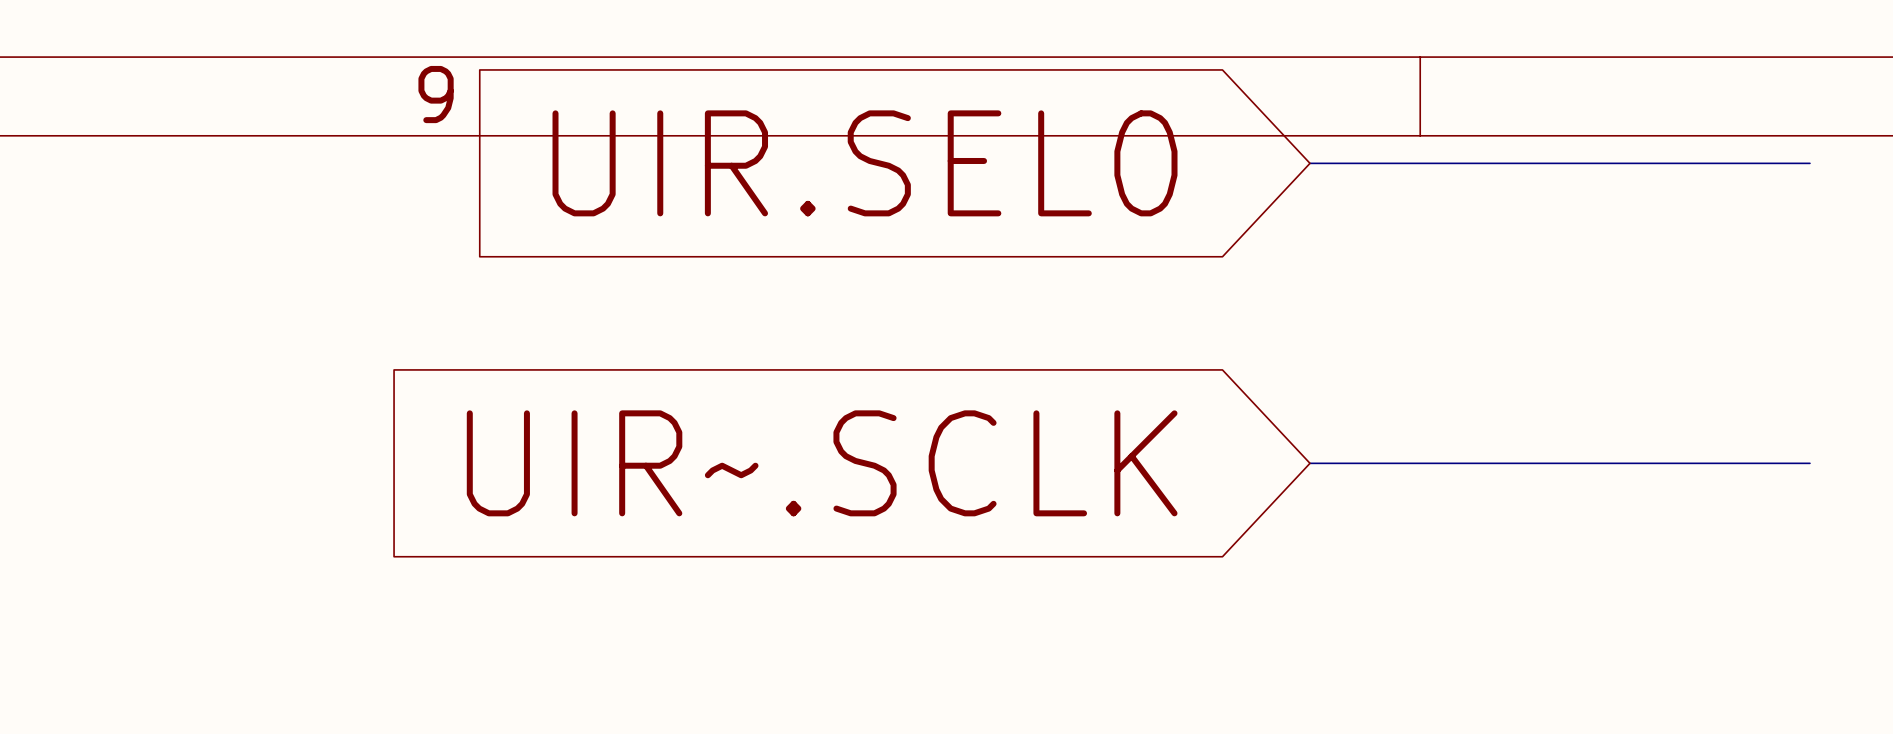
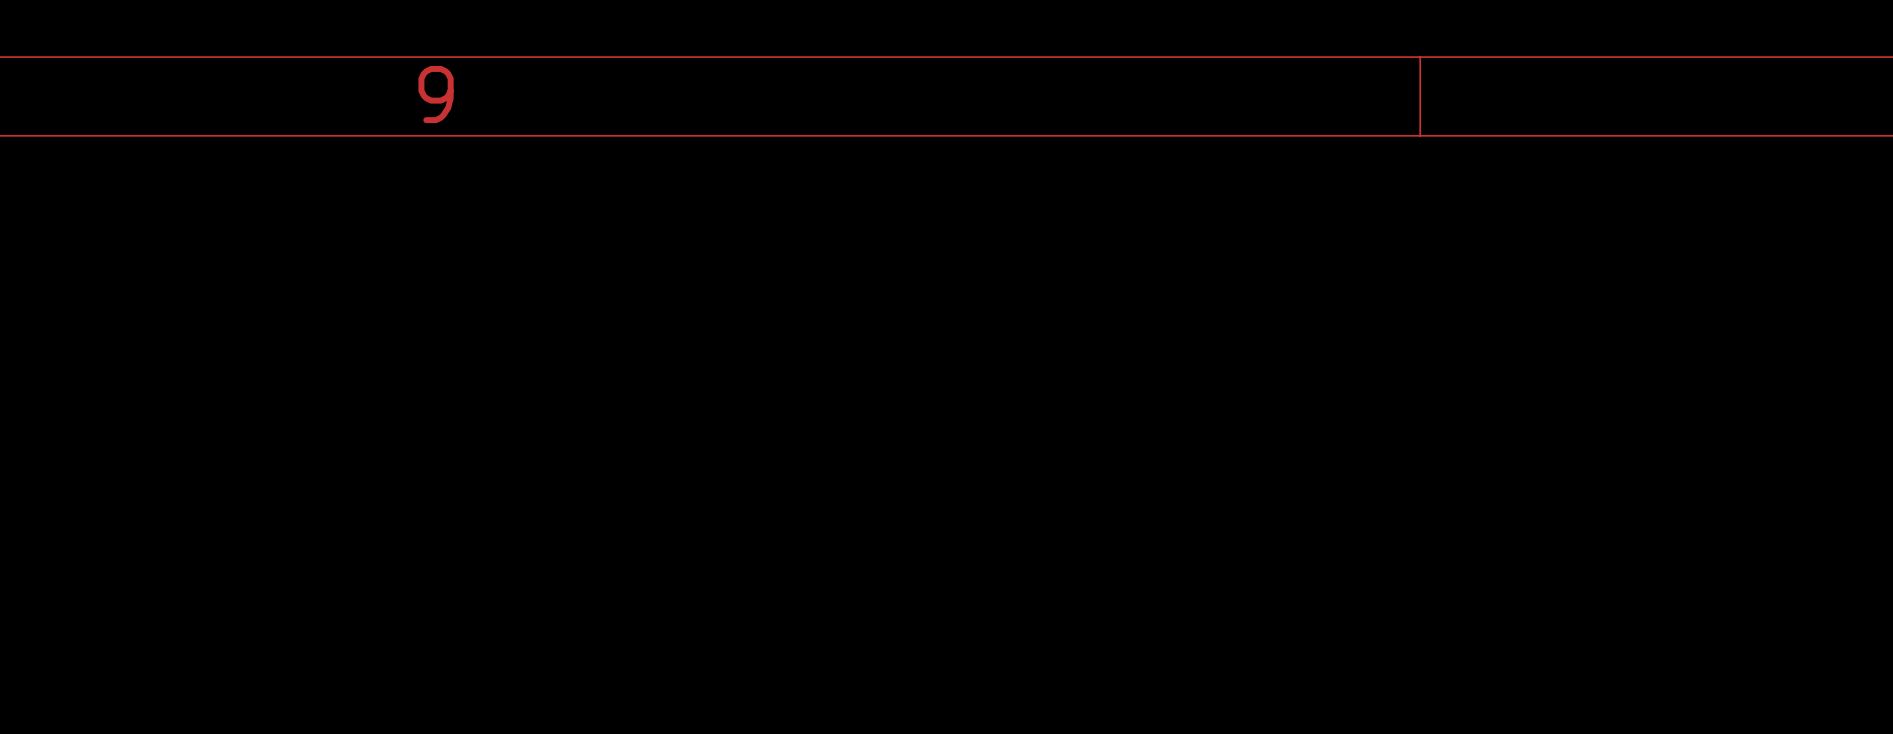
global label: UIR.SEL0 (865, 163) -> none
wire: (1309, 163) (1809, 163) -> none
global label: UIR~.SCLK (822, 463) -> none
wire: (1309, 463) (1809, 463) -> none

